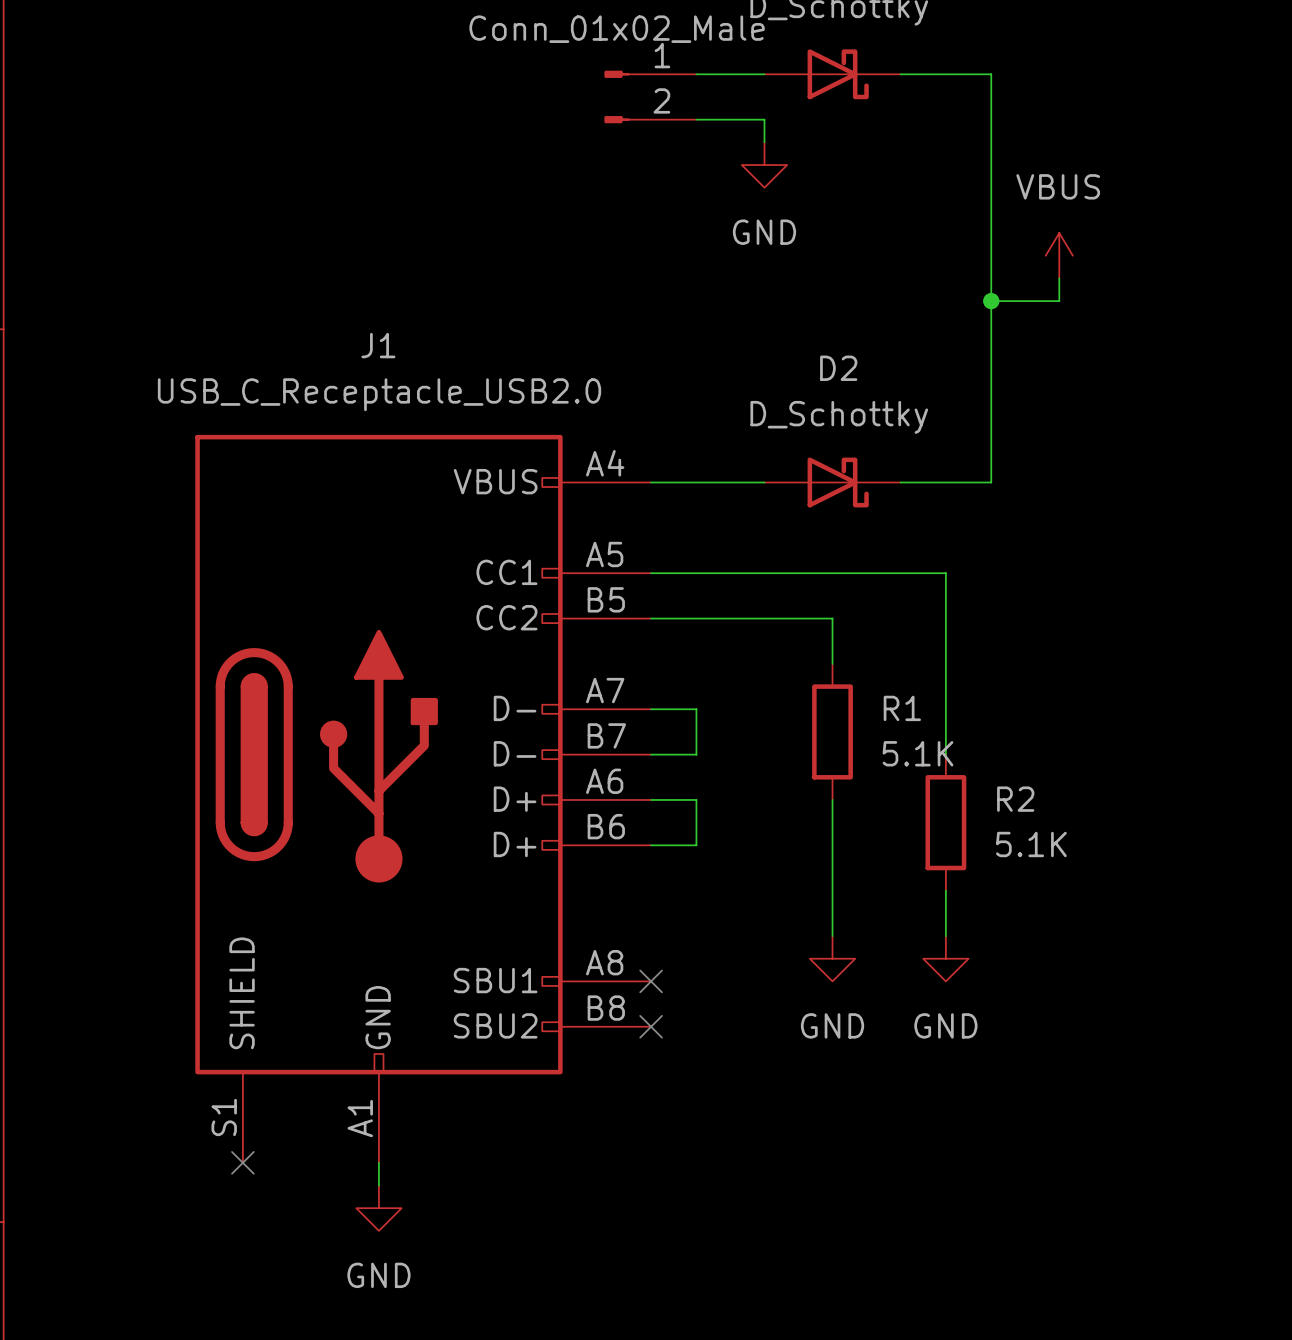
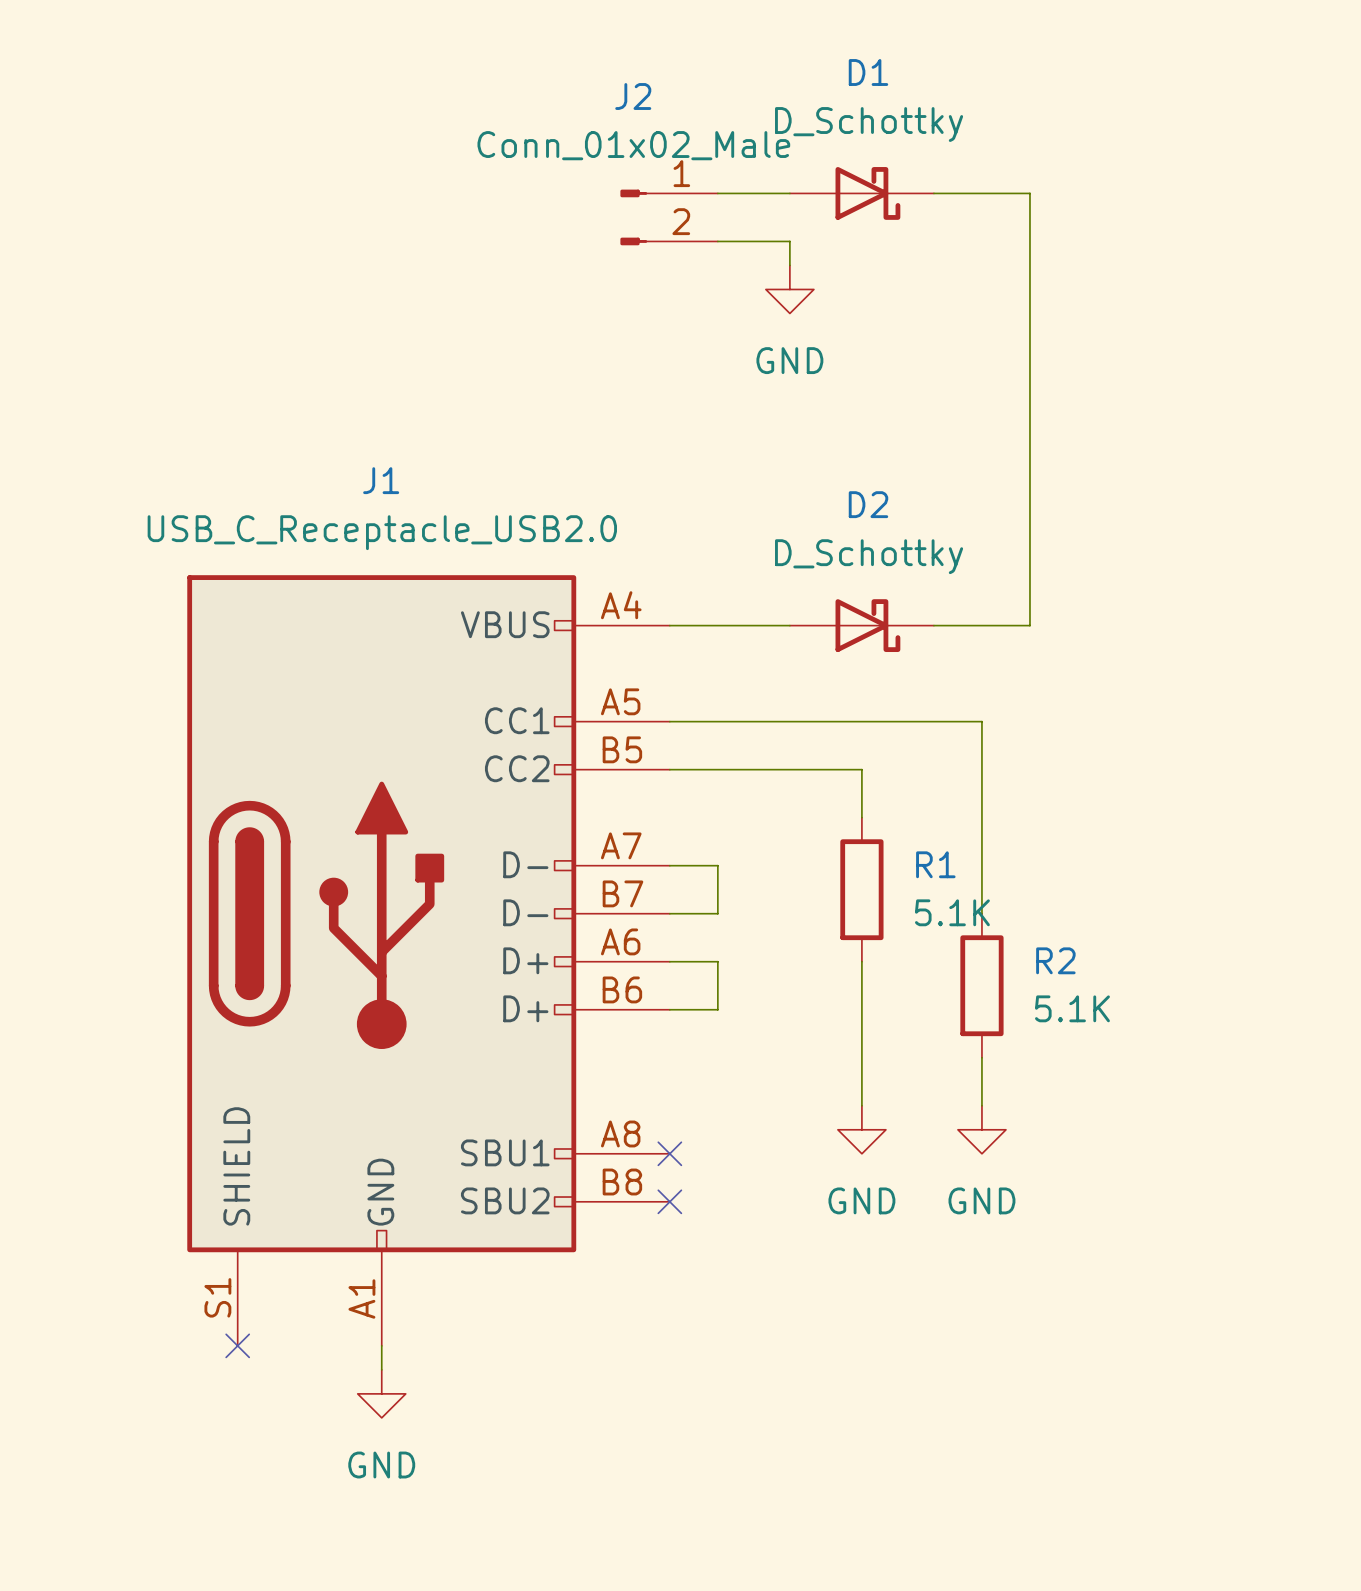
power symbol: VBUS (1059, 255) -> none
wire: (1059, 278) (1059, 301) (991, 301) -> none
junction: (991, 301) -> none

